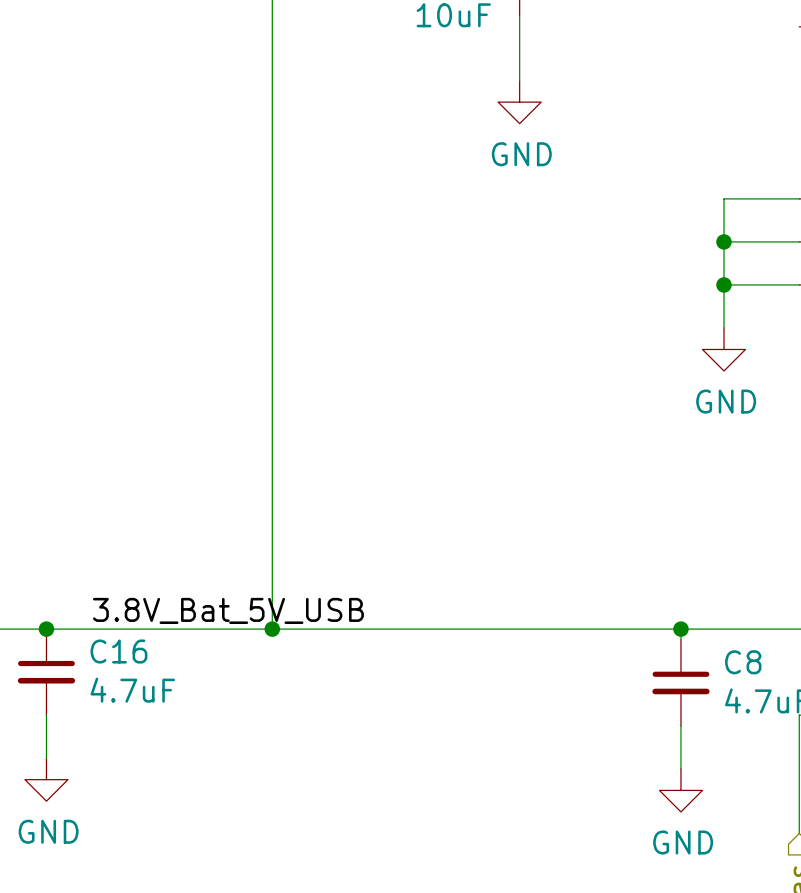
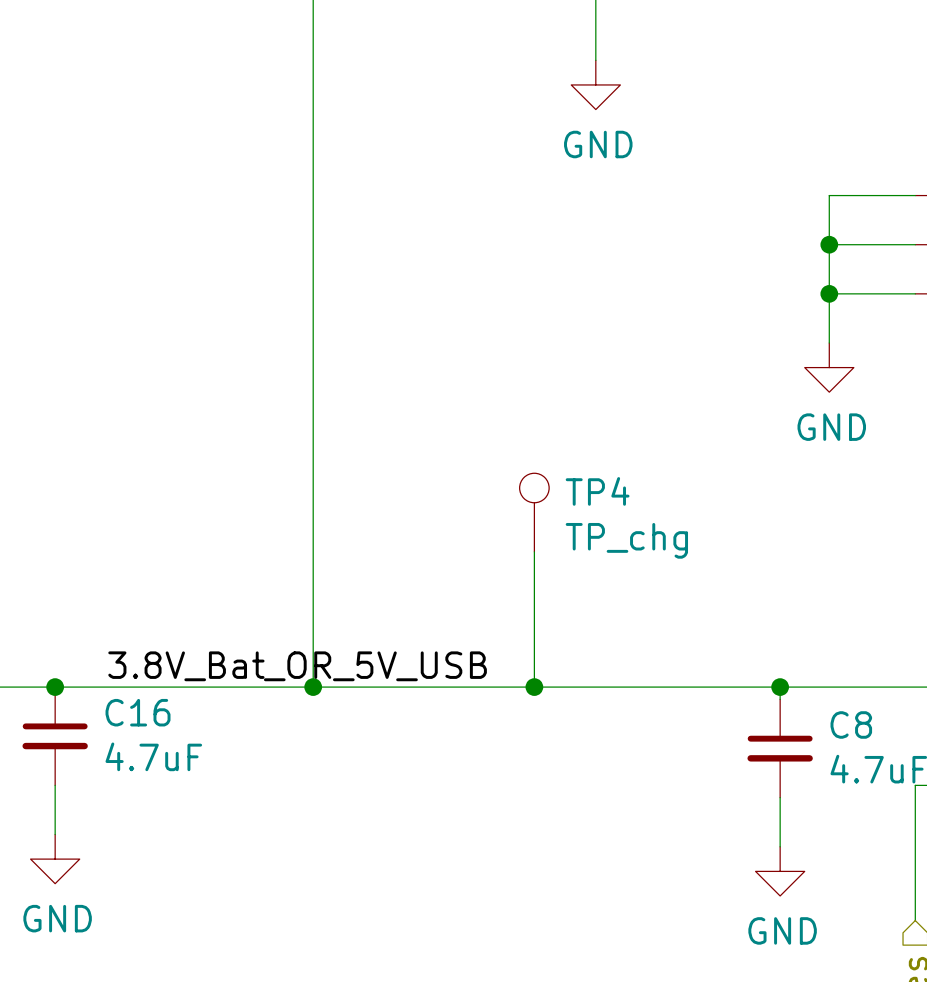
TP4: none -> TP_chg (534, 512)
wire: none -> (534, 551) (534, 687)
label: 3.8V_Bat_5V_USB (228, 610) -> 3.8V_Bat_OR_5V_USB (297, 666)
junction: none -> (534, 687)

